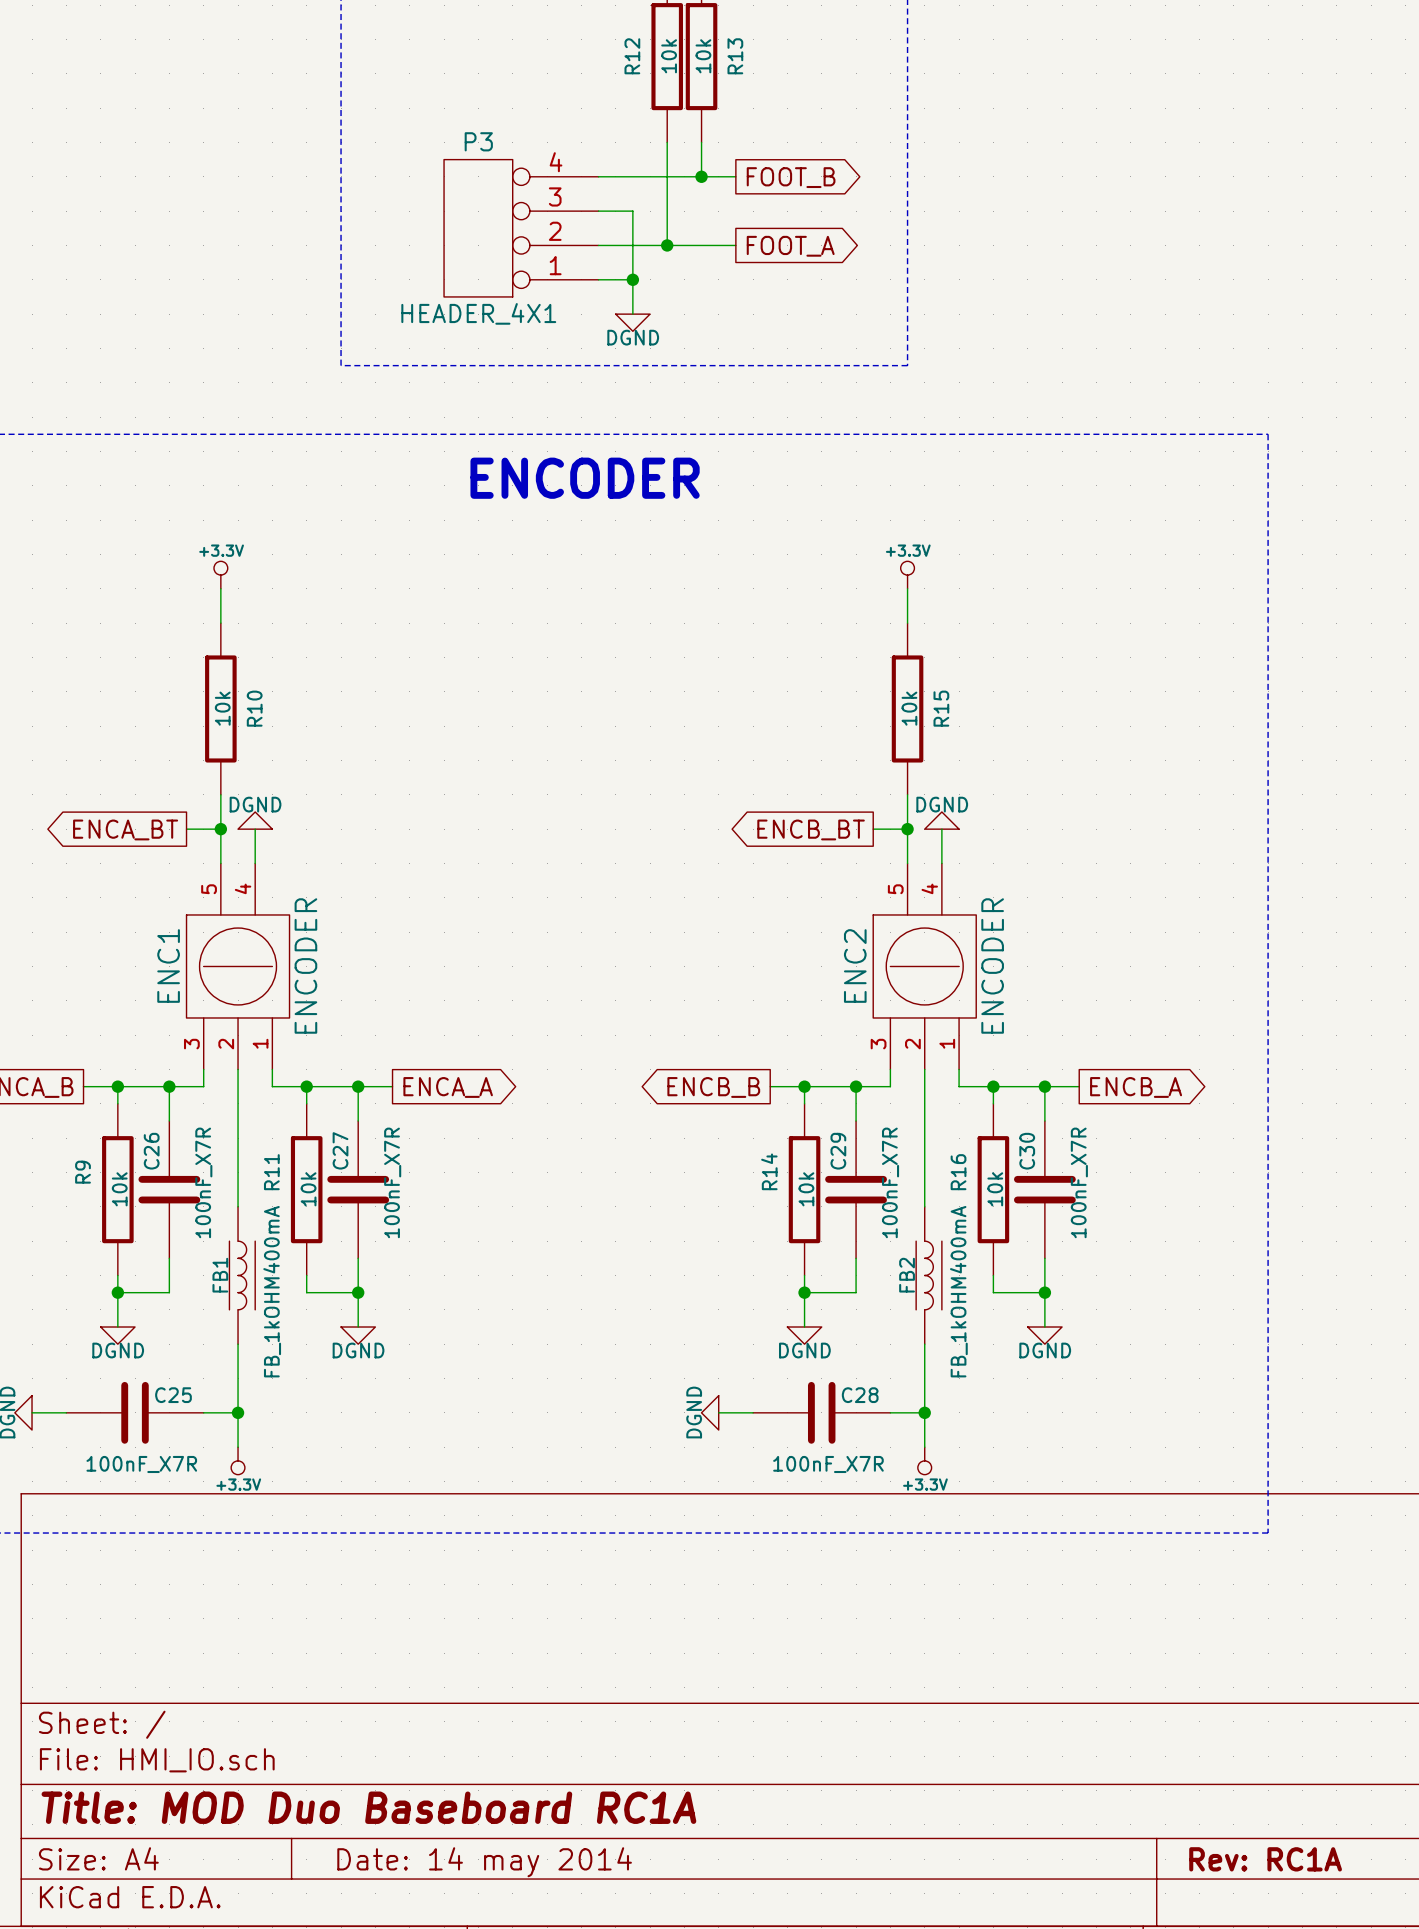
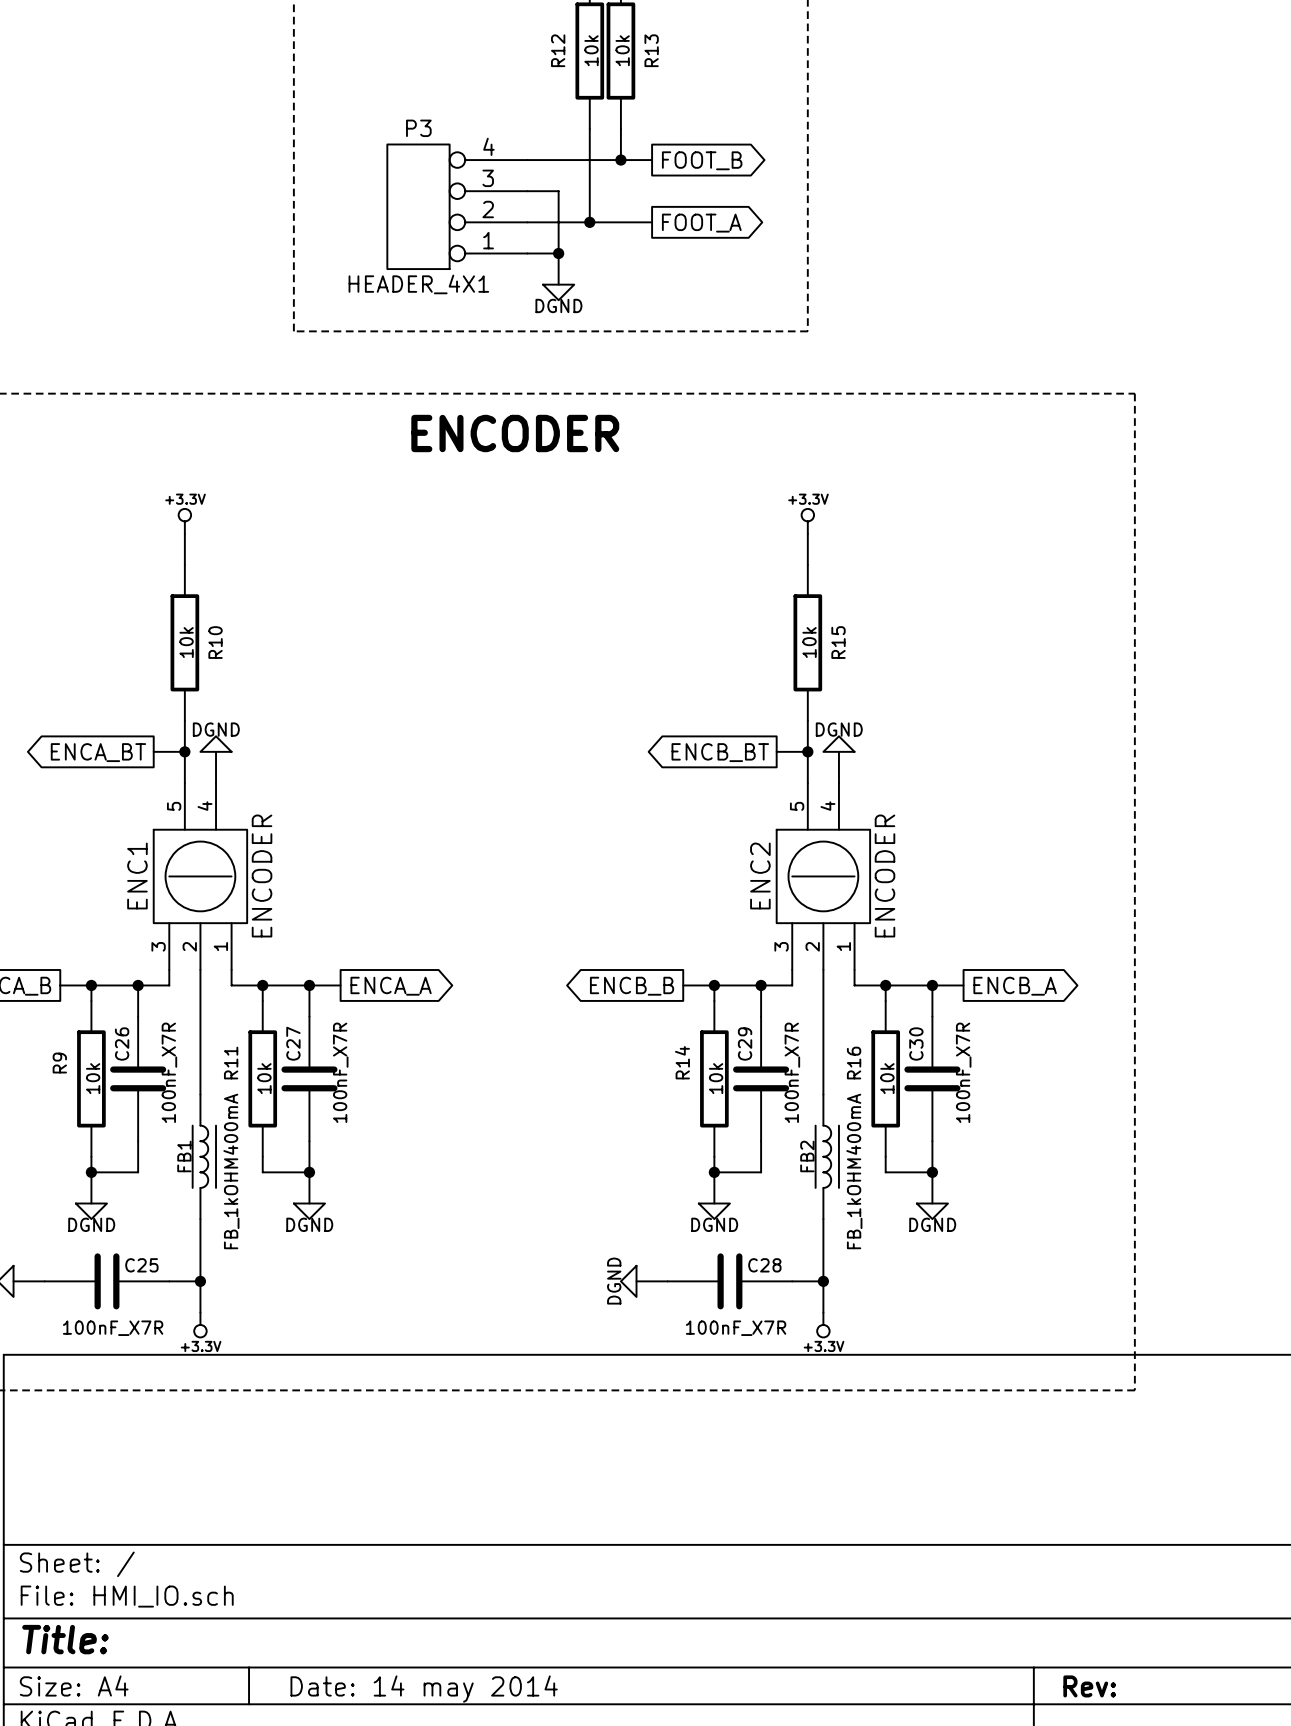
title block: Title: MOD Duo Baseboard RC1A (368, 1807) -> Title: (65, 1639)
title block: Rev: RC1A (1265, 1859) -> Rev: (1089, 1686)

